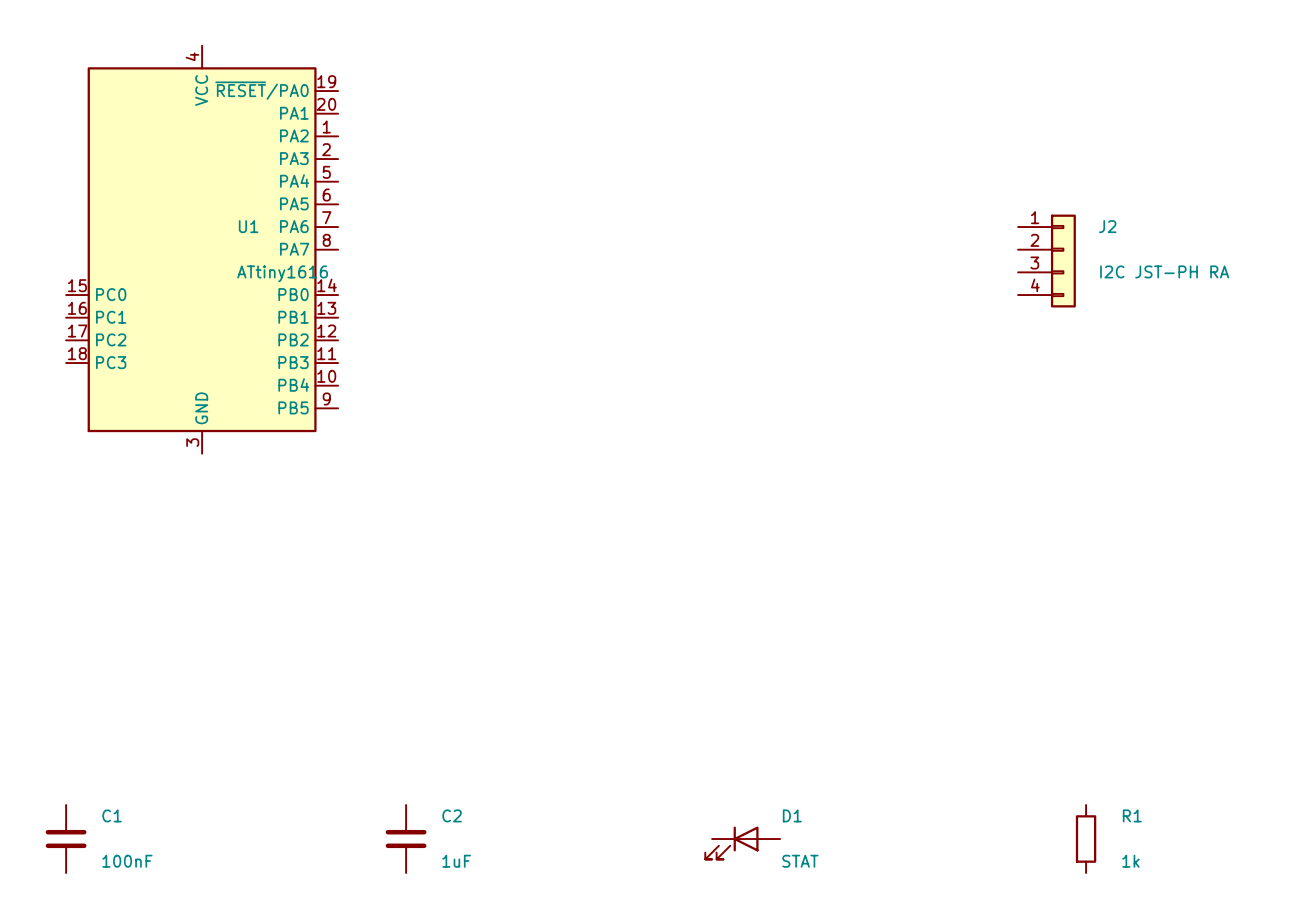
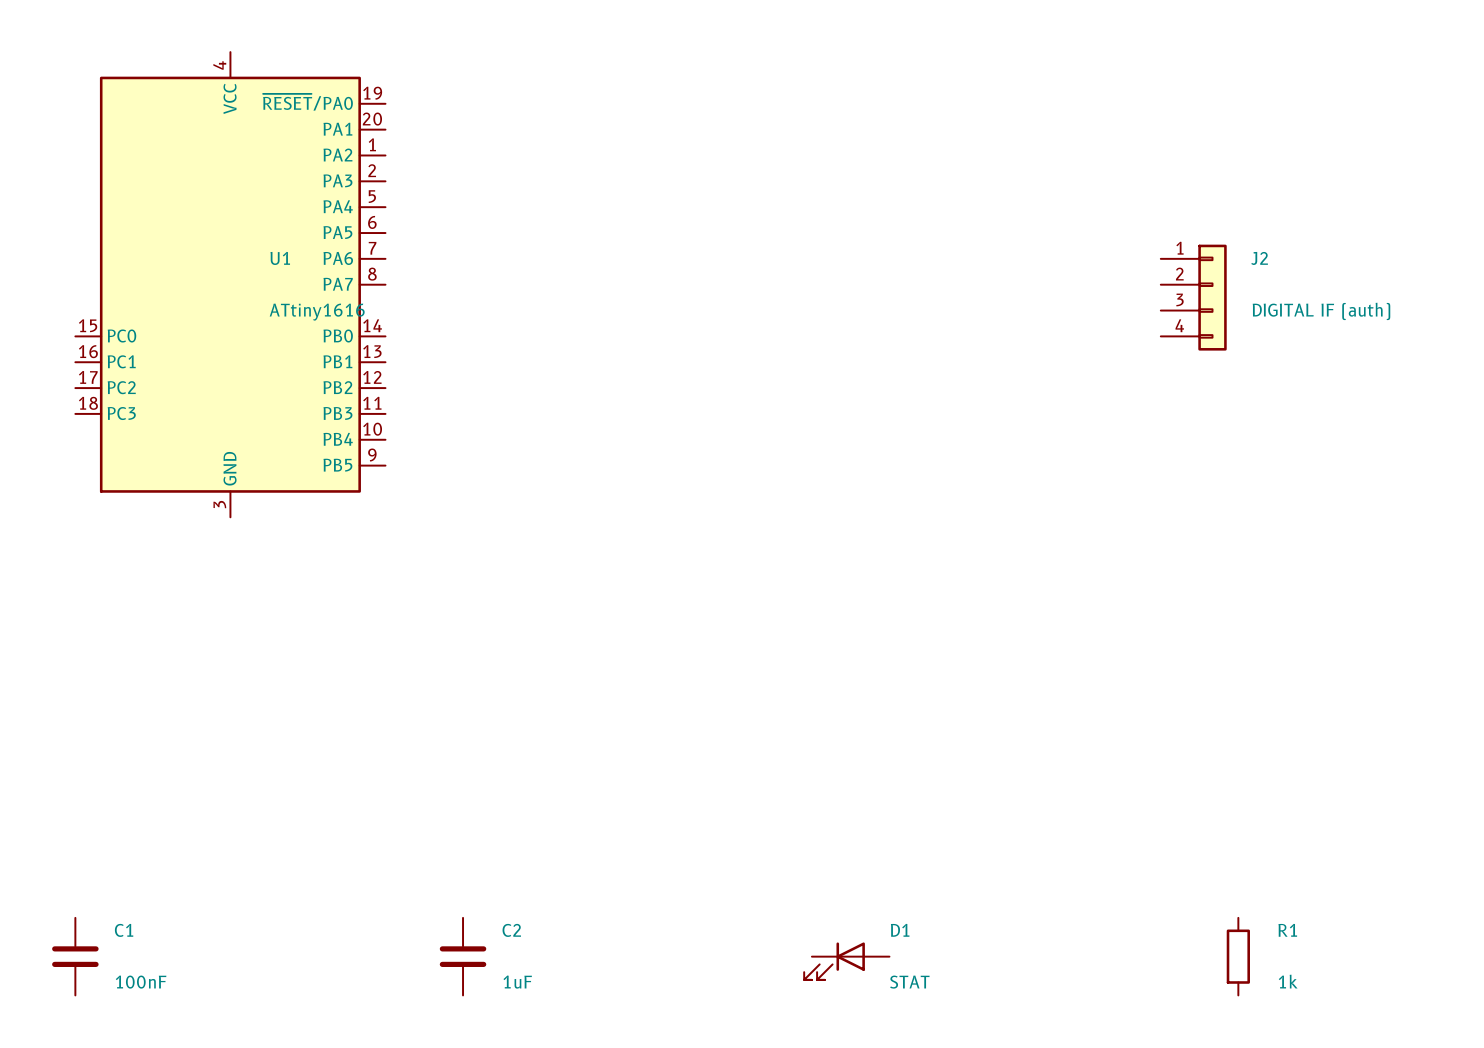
J2 value: I2C JST-PH RA (1164, 271) -> DIGITAL IF (auth) (1321, 311)

